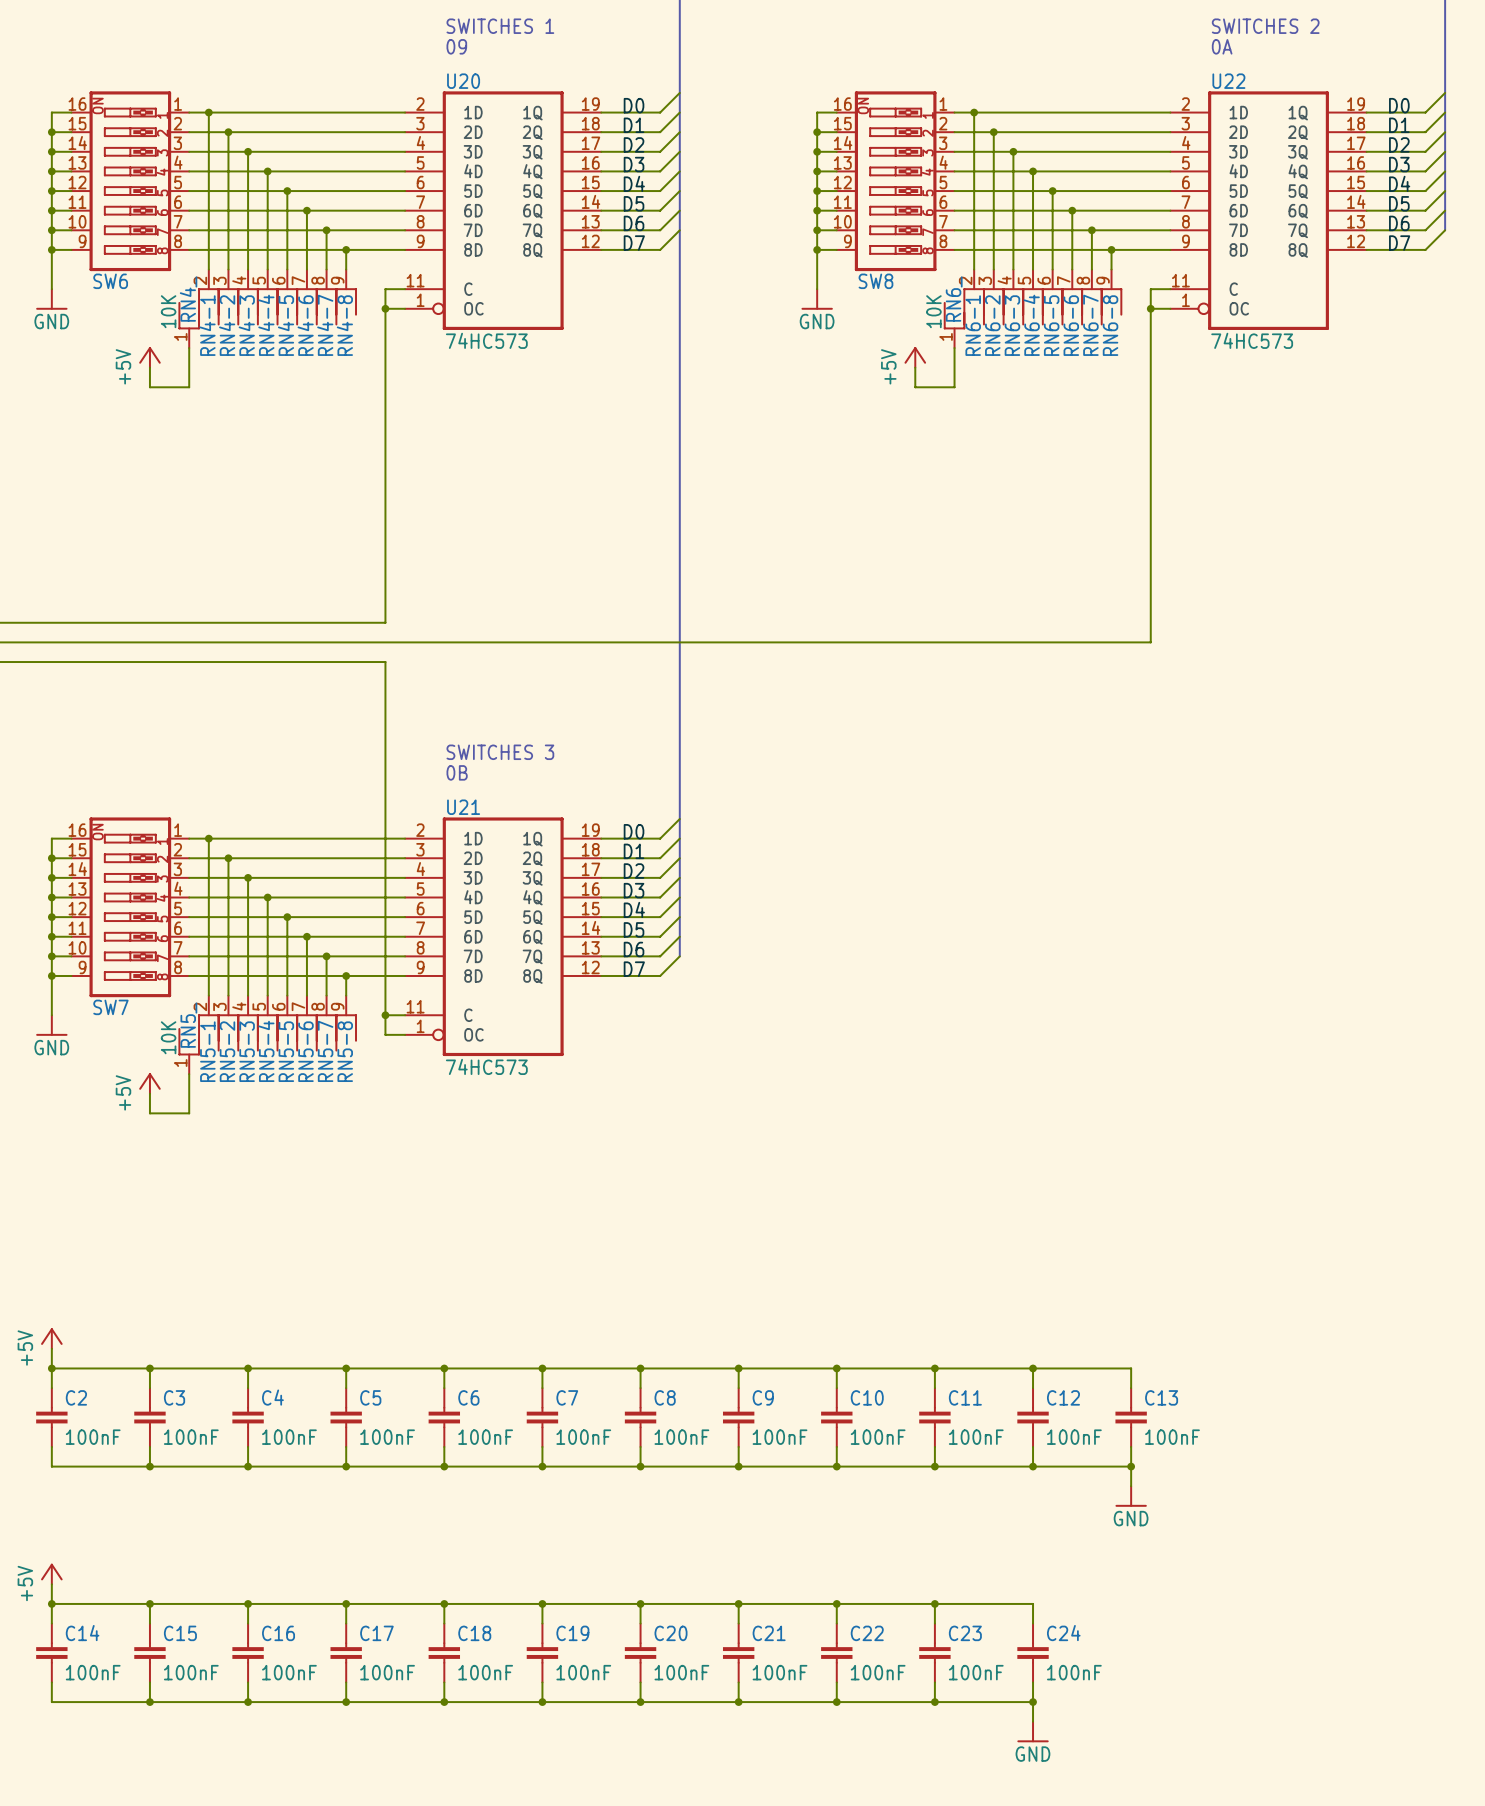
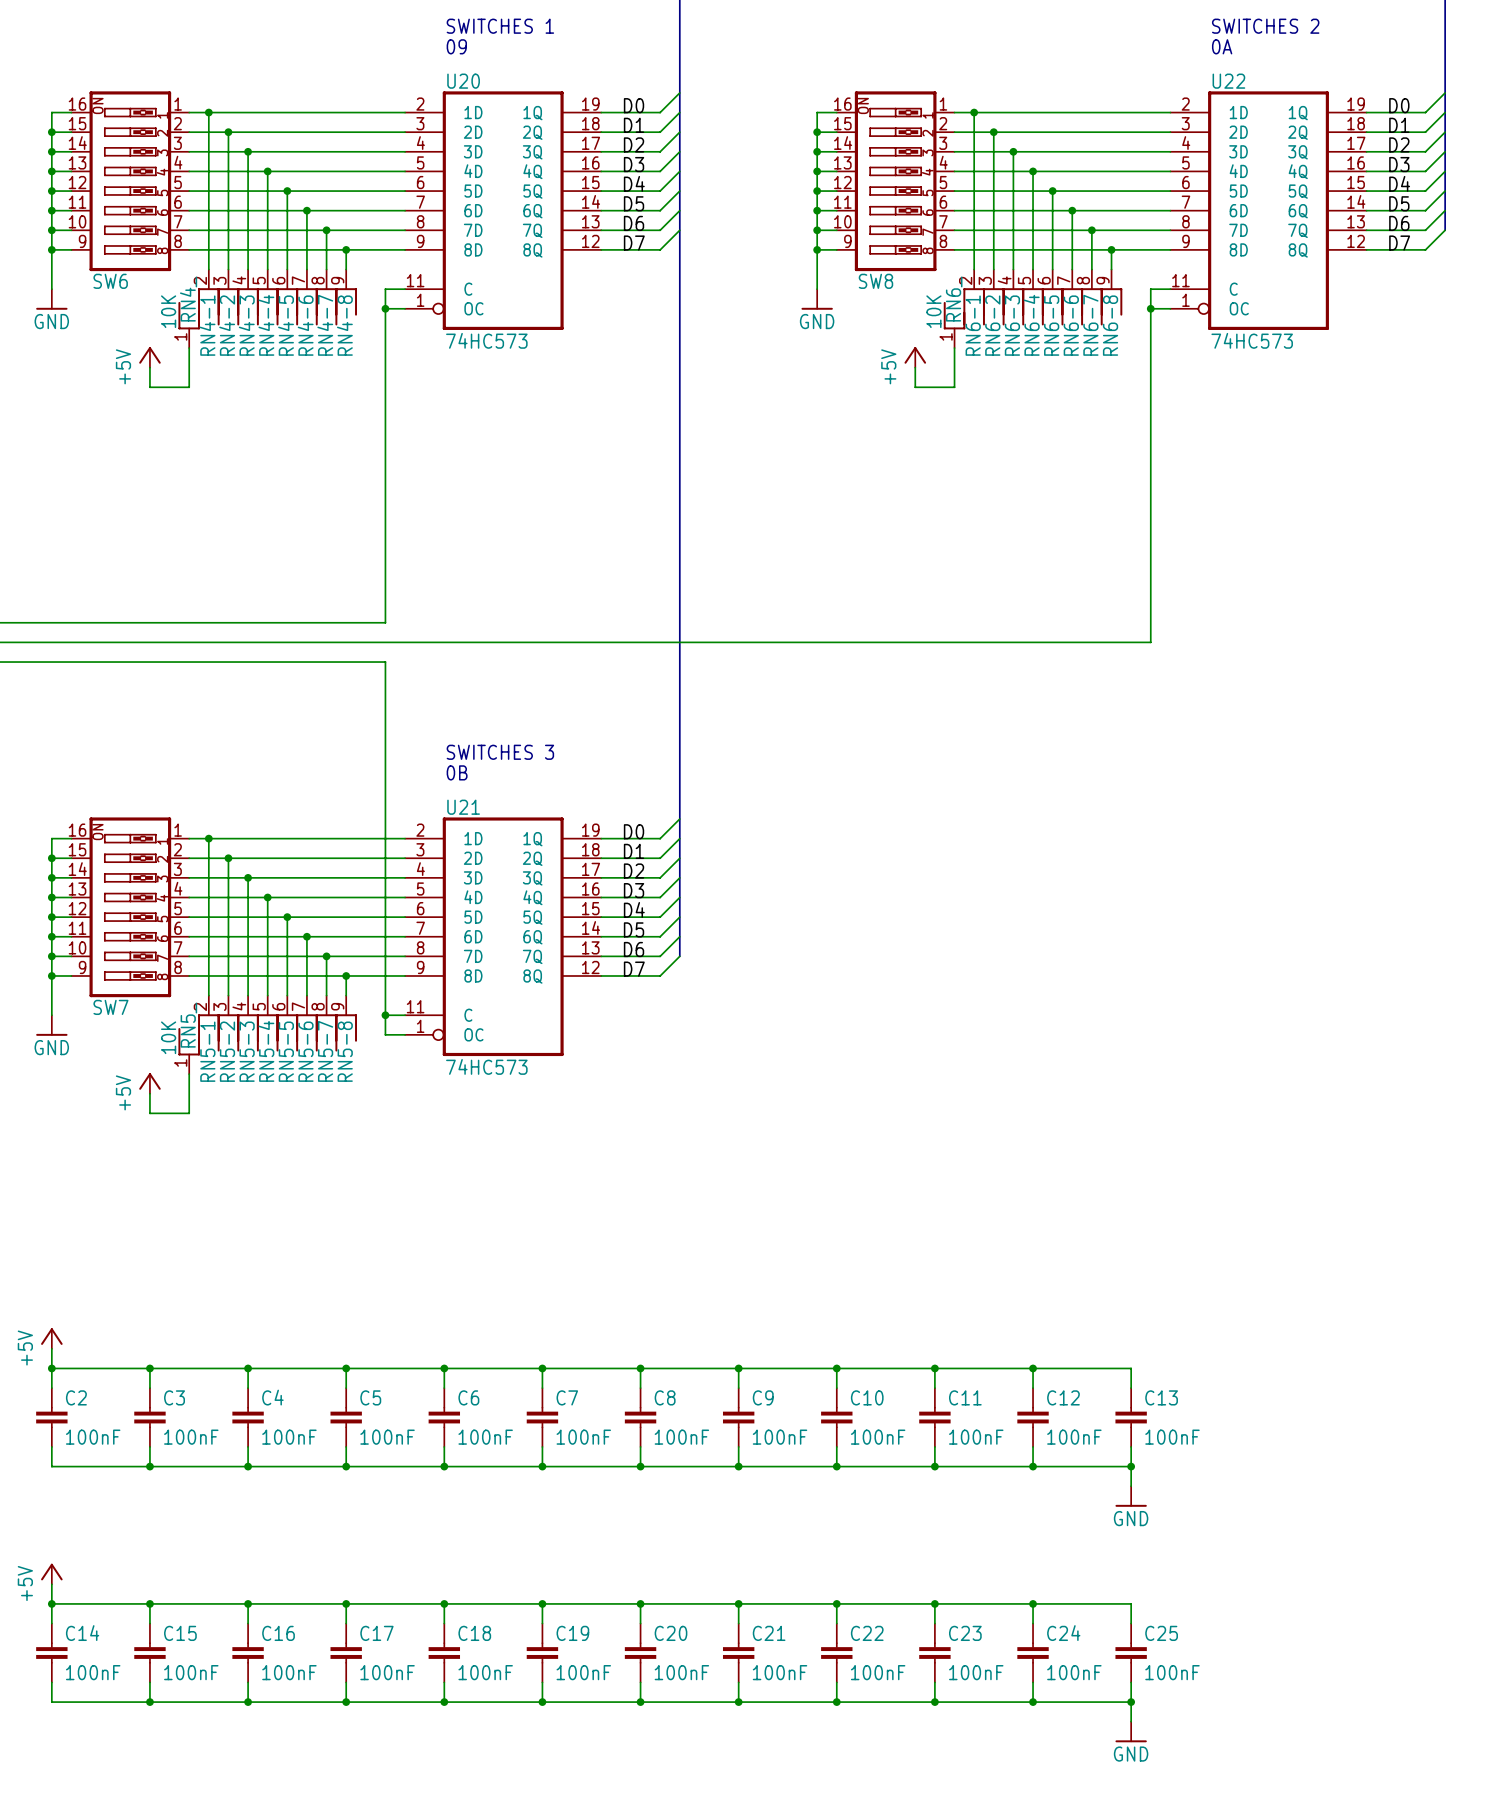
wire: none -> (1033, 1603) (1131, 1603) (1131, 1623)
junction: none -> (1033, 1603)
C25: none -> 100nF (1131, 1653)
wire: none -> (1131, 1682) (1131, 1721)
wire: (1033, 1702) (1033, 1721) -> (1033, 1702) (1131, 1702)
junction: none -> (1131, 1702)
power symbol position: GND (1033, 1732) -> GND (1131, 1732)

